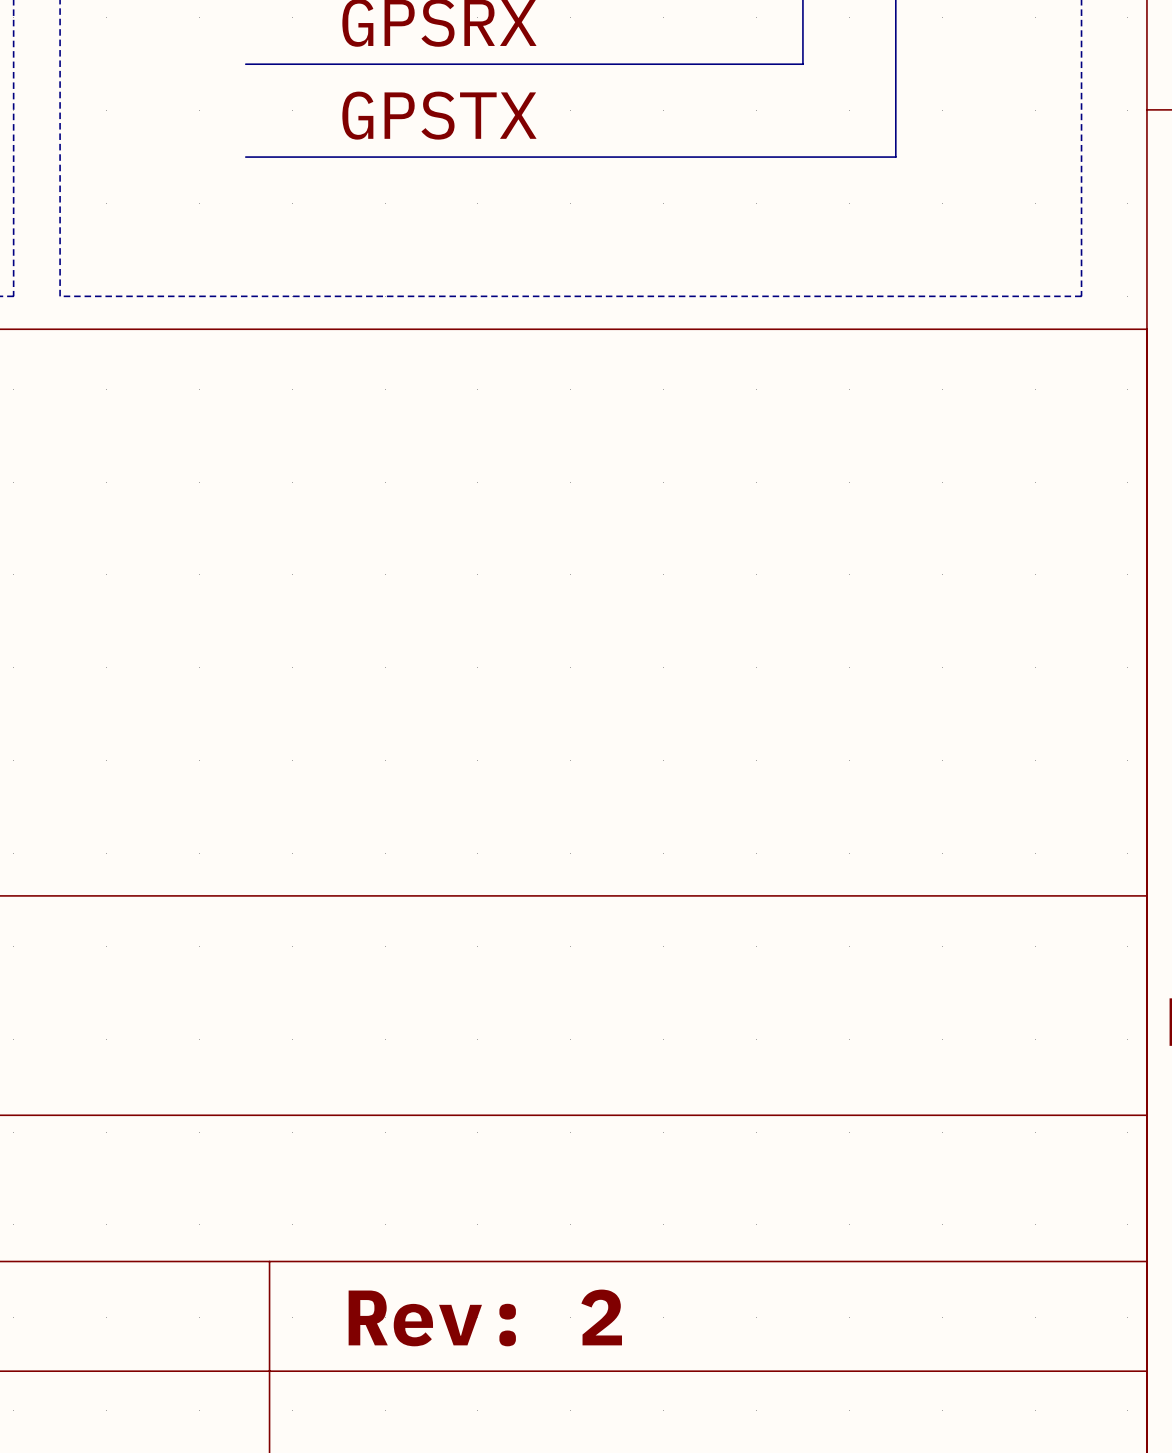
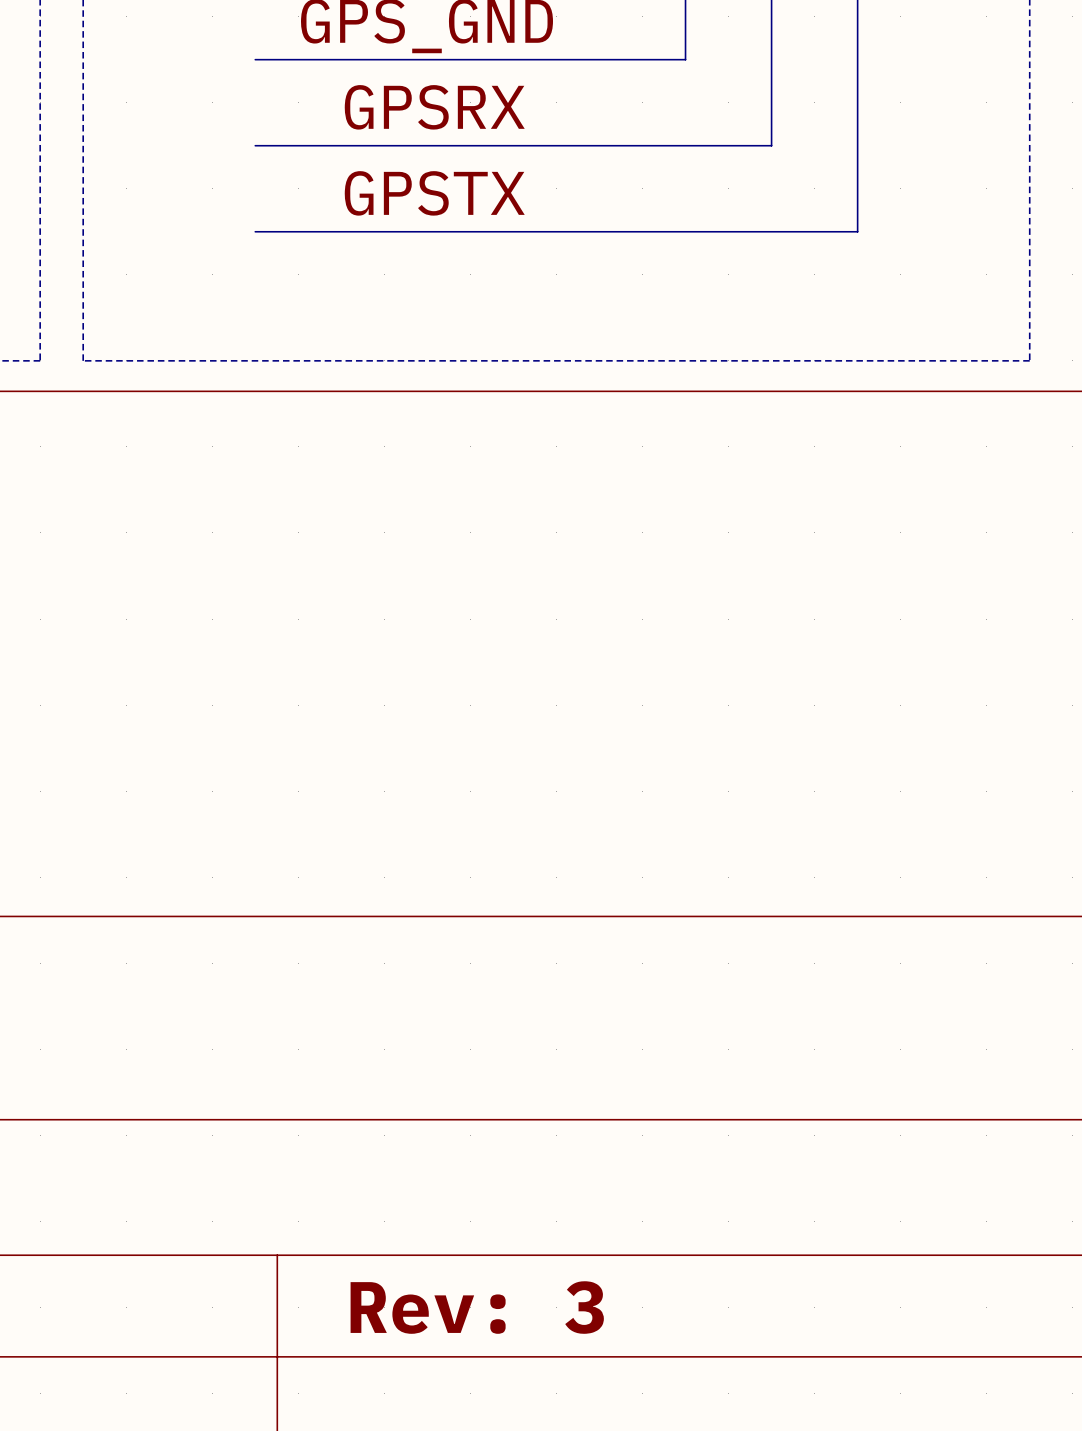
title block: Rev: 2 (485, 1317) -> Rev: 3 (477, 1307)

